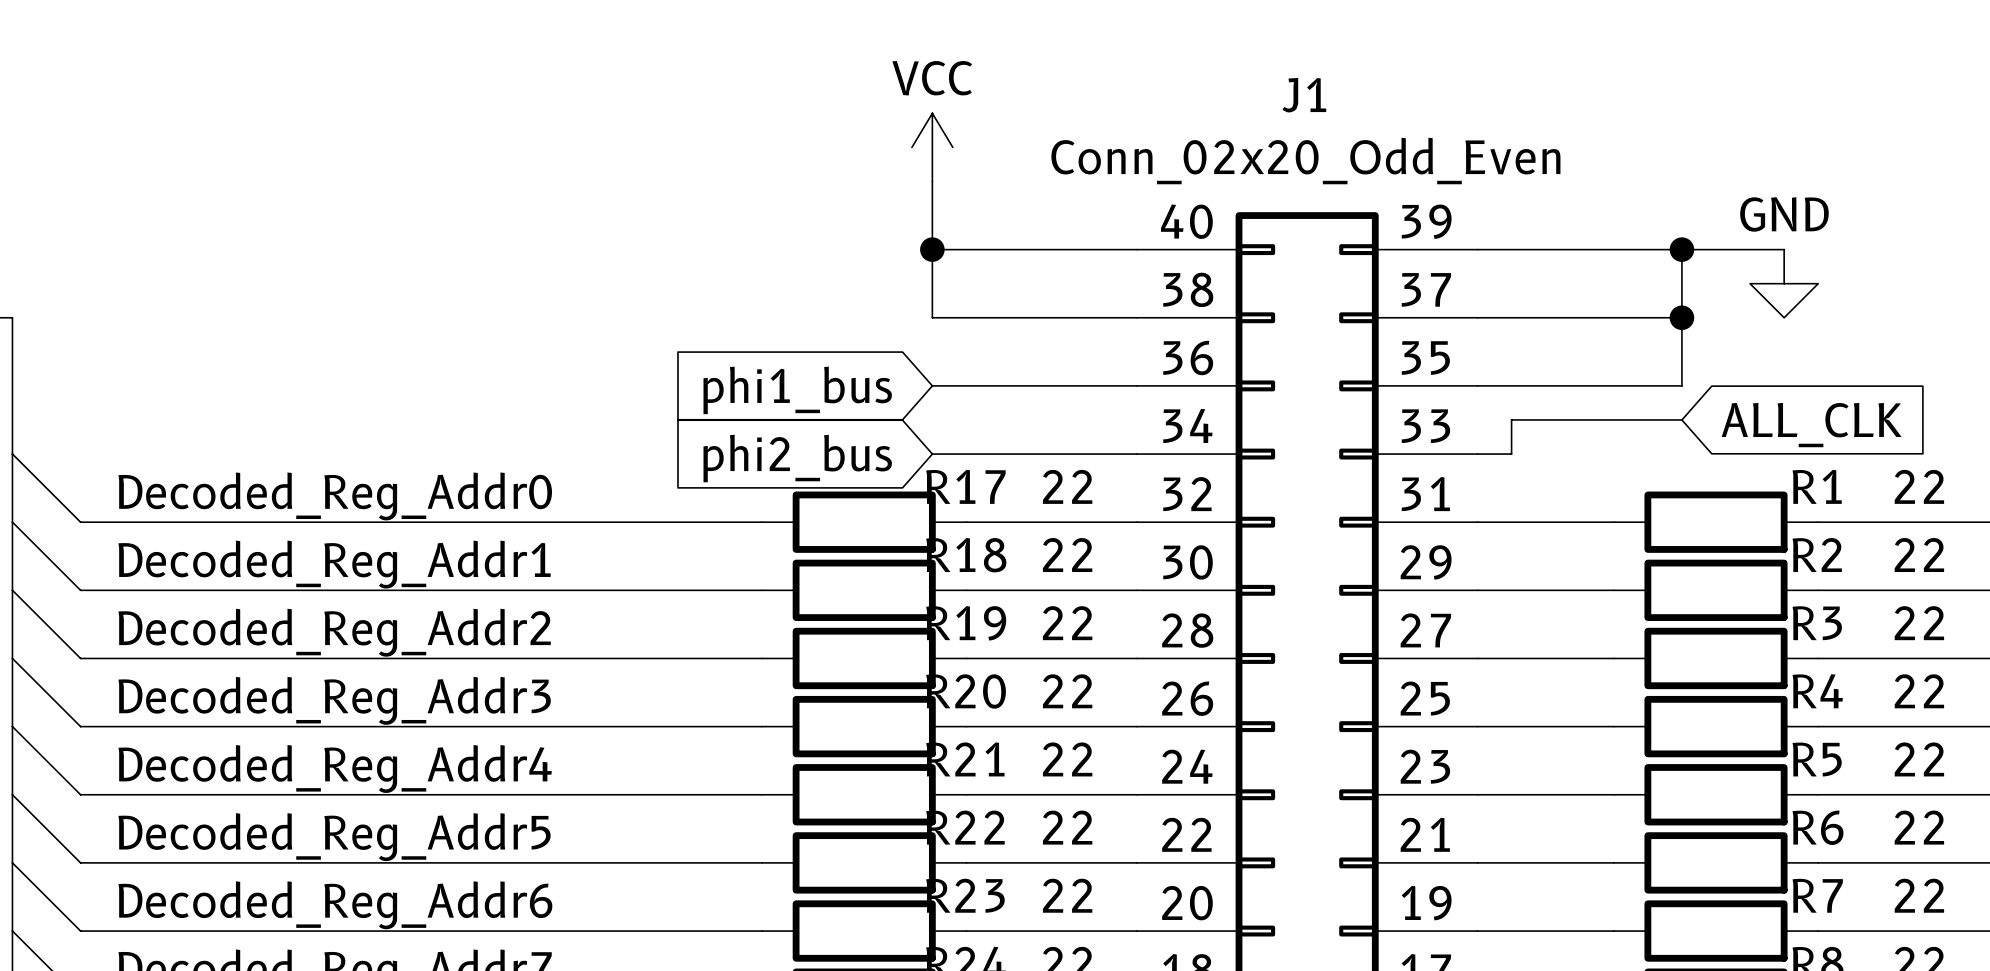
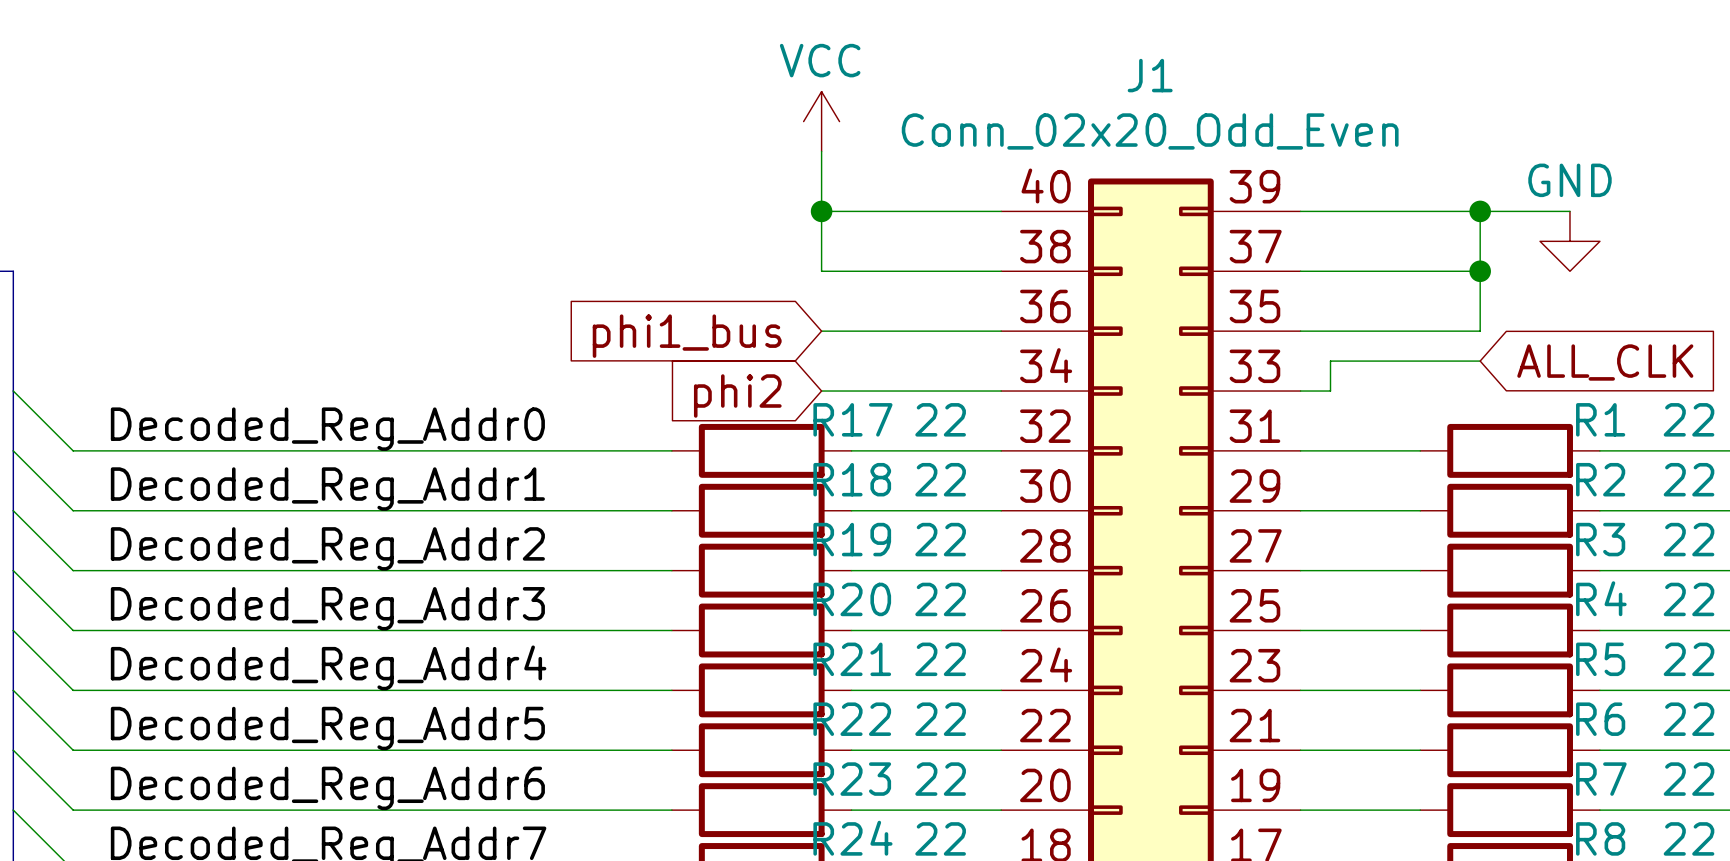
global label: phi2_bus (797, 458) -> phi2 (737, 396)

